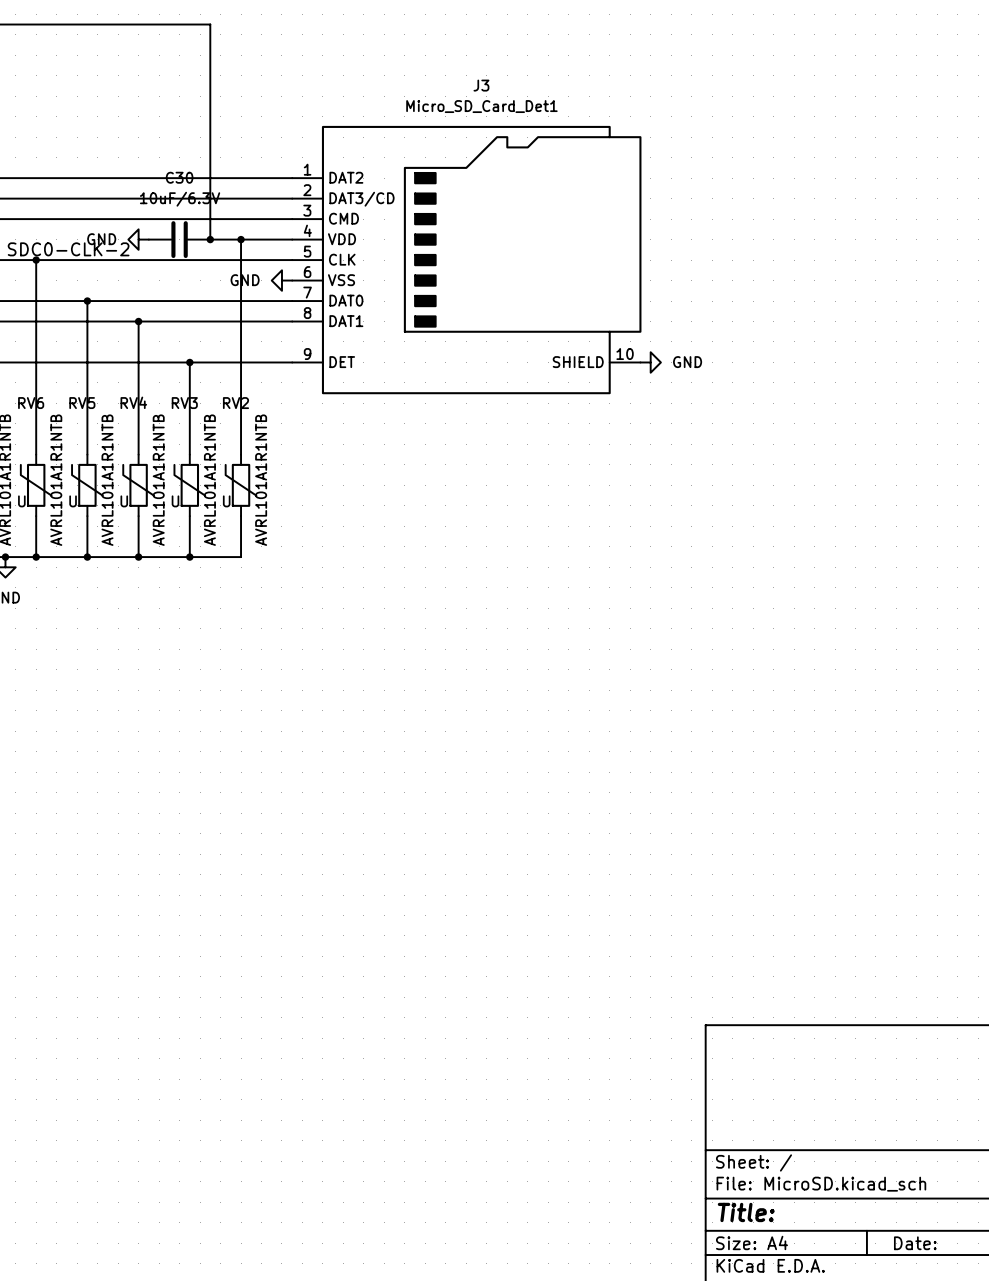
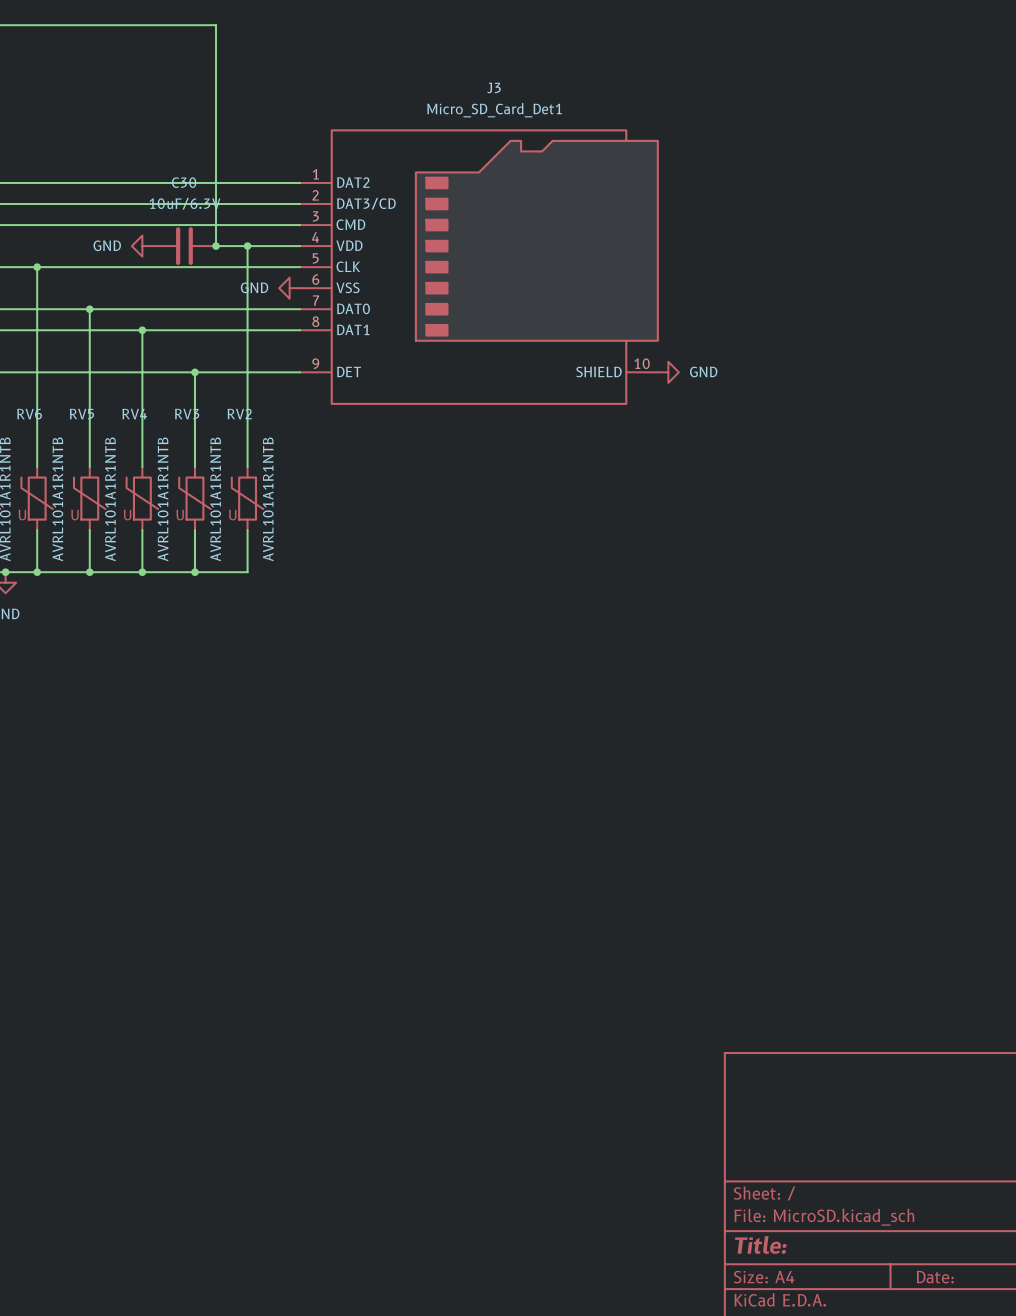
label: SDC0-CLK-2 (68, 249) -> none

